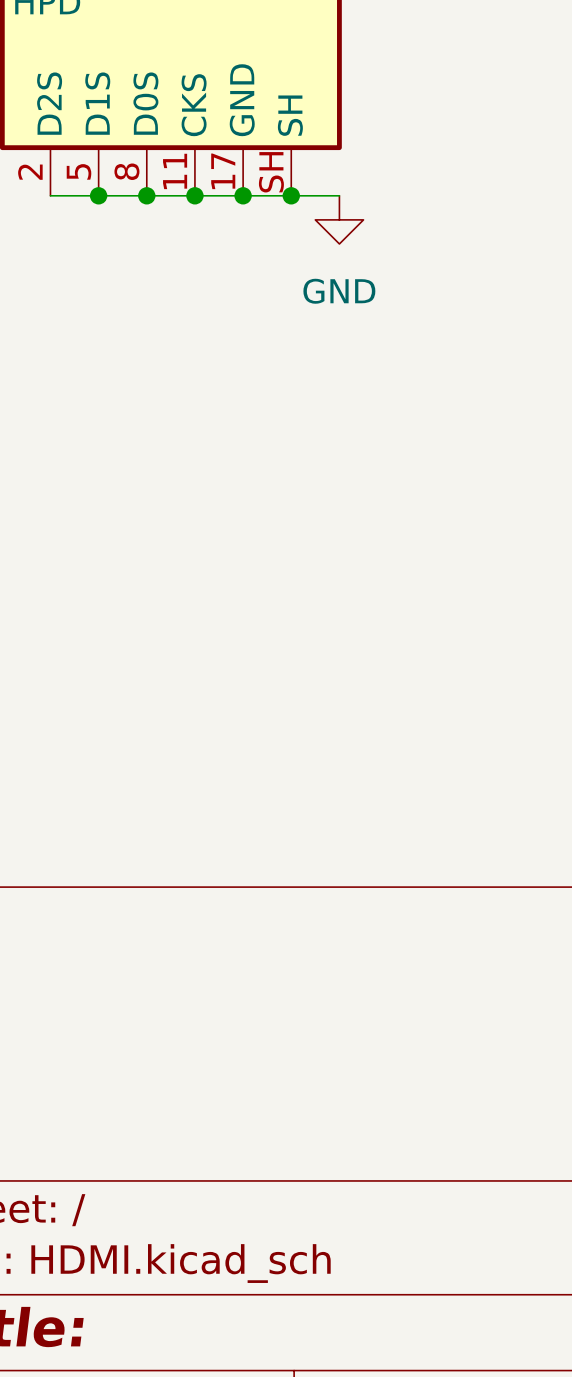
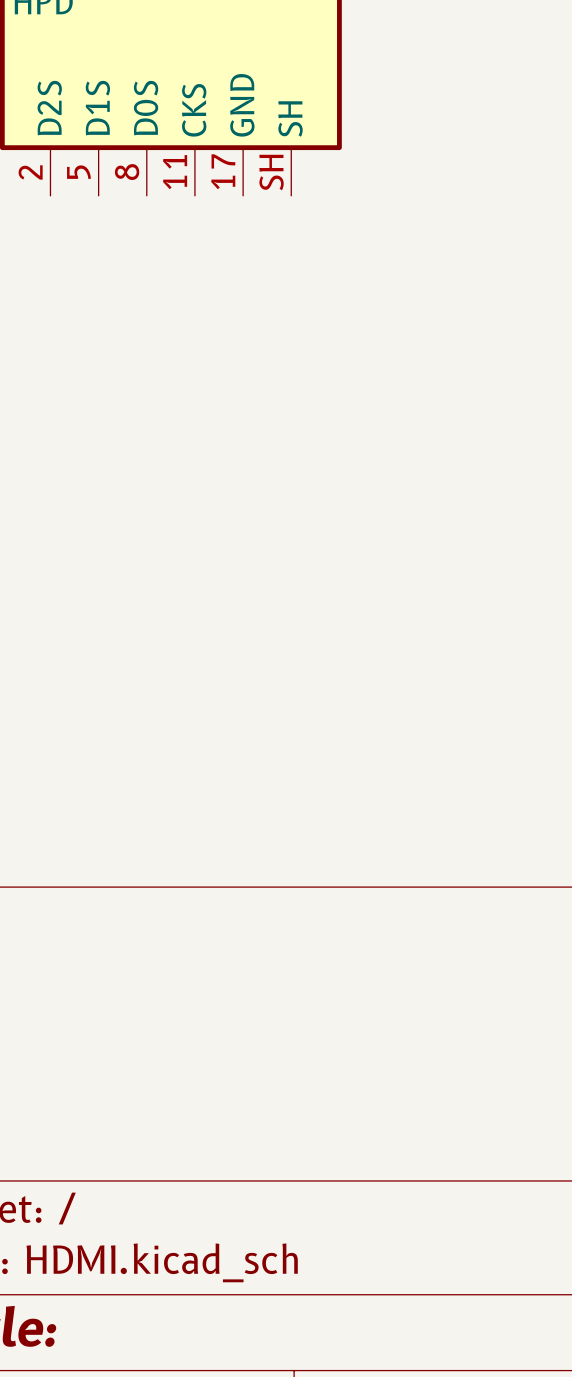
wire: (50, 195) (339, 195) -> none
junction: (98, 195) -> none
junction: (146, 195) -> none
junction: (194, 195) -> none
junction: (243, 195) -> none
junction: (291, 195) -> none
power symbol: GND (339, 219) -> none

